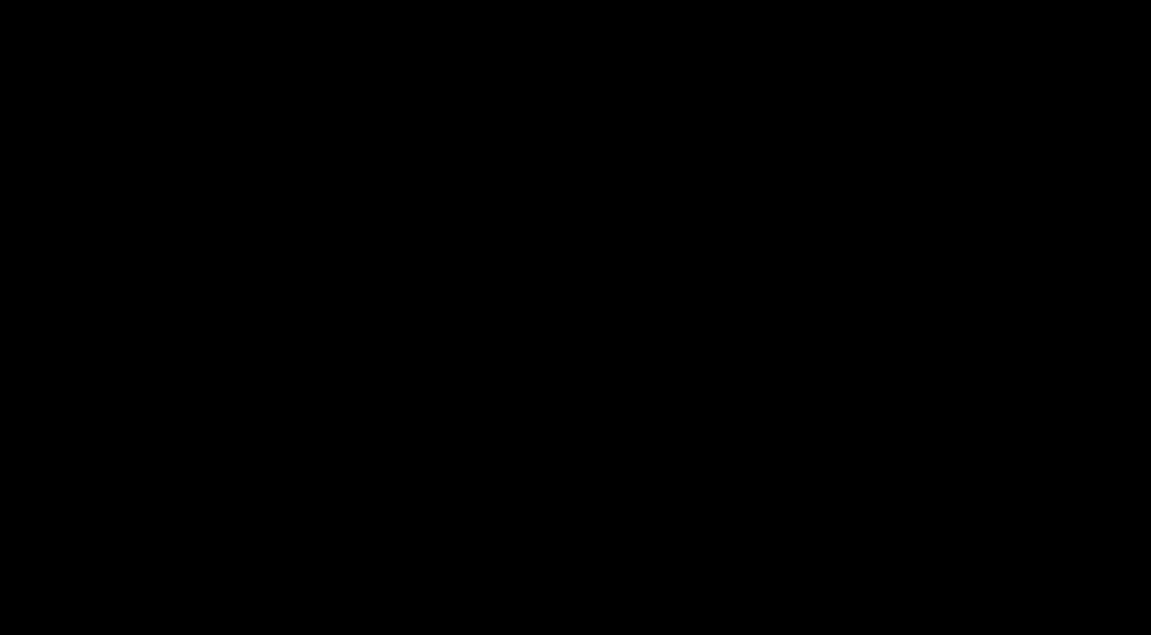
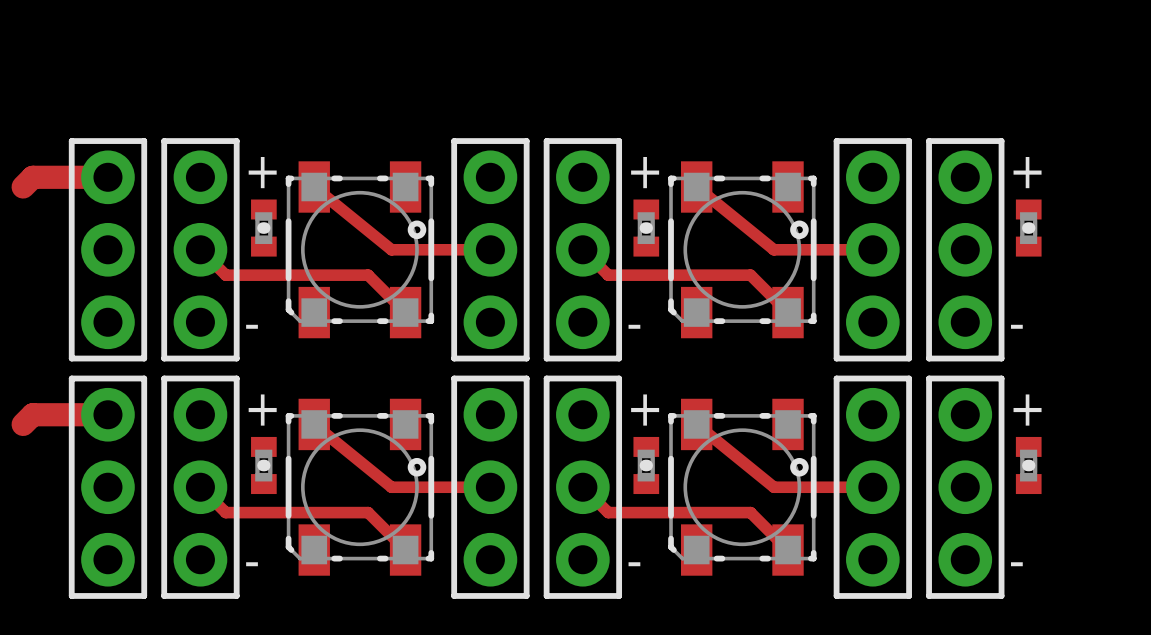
text: none -> + (262, 172)
text: none -> + (645, 172)
text: none -> + (1027, 172)
top track: none -> (107, 177) (32, 177) (23, 187)
top track: none -> (314, 187) (391, 249) (490, 249)
top track: none -> (696, 187) (773, 249) (872, 249)
part: none -> (263, 228)
part: none -> (646, 228)
part: none -> (1028, 228)
part: none -> (107, 249)
top track: none -> (200, 249) (225, 275) (368, 275) (405, 312)
part: none -> (200, 249)
part: none -> (359, 249)
part: none -> (490, 249)
top track: none -> (582, 249) (608, 275) (750, 275) (788, 312)
part: none -> (582, 249)
part: none -> (742, 249)
part: none -> (872, 249)
part: none -> (965, 249)
text: none -> - (252, 326)
text: none -> - (634, 326)
text: none -> - (1016, 326)
text: none -> + (262, 410)
text: none -> + (645, 410)
text: none -> + (1027, 410)
top track: none -> (107, 414) (32, 414) (23, 424)
top track: none -> (314, 424) (391, 487) (490, 487)
top track: none -> (696, 424) (773, 487) (872, 487)
part: none -> (263, 465)
part: none -> (646, 465)
part: none -> (1028, 465)
part: none -> (107, 487)
top track: none -> (200, 487) (225, 512) (368, 512) (405, 550)
part: none -> (200, 487)
part: none -> (359, 487)
part: none -> (490, 487)
top track: none -> (582, 487) (608, 512) (750, 512) (788, 550)
part: none -> (582, 487)
part: none -> (742, 487)
part: none -> (872, 487)
part: none -> (965, 487)
text: none -> - (252, 564)
text: none -> - (634, 564)
text: none -> - (1016, 564)

